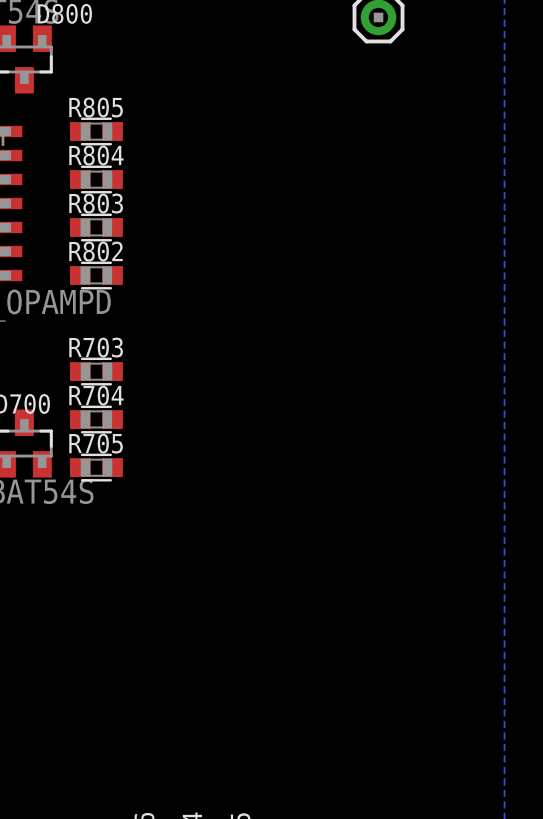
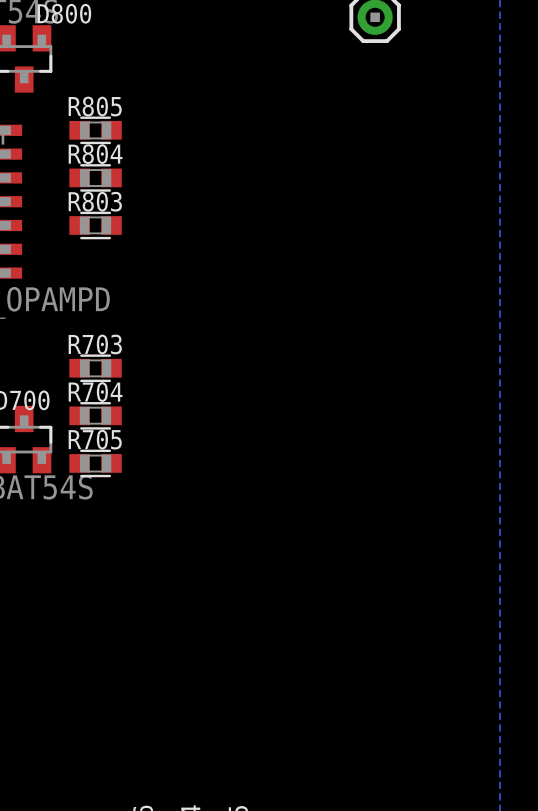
R802: (96, 275) -> none

